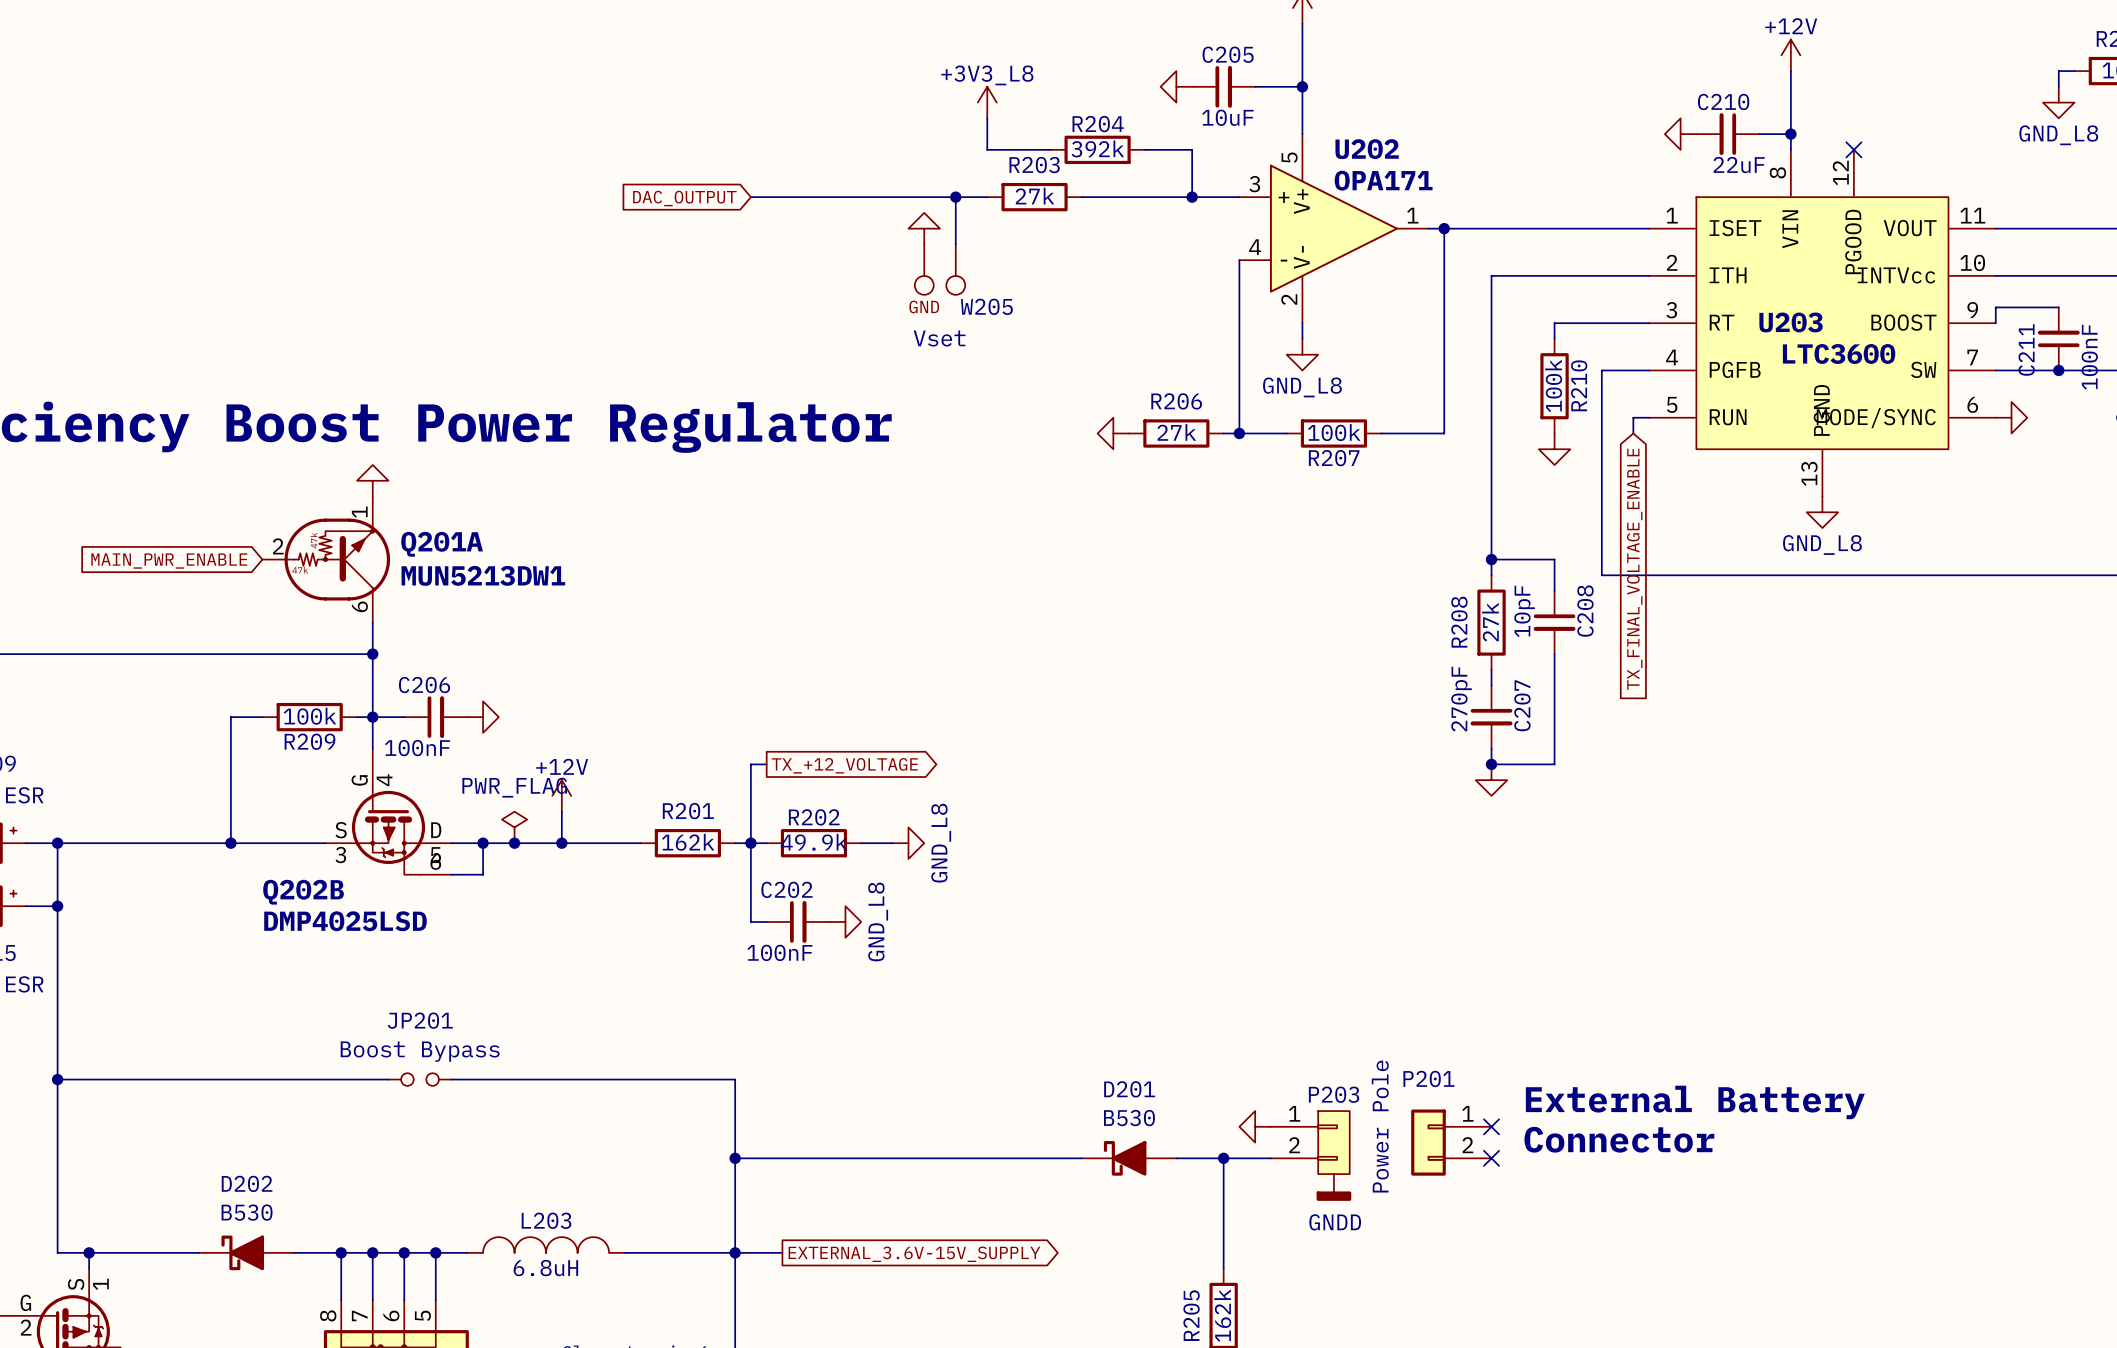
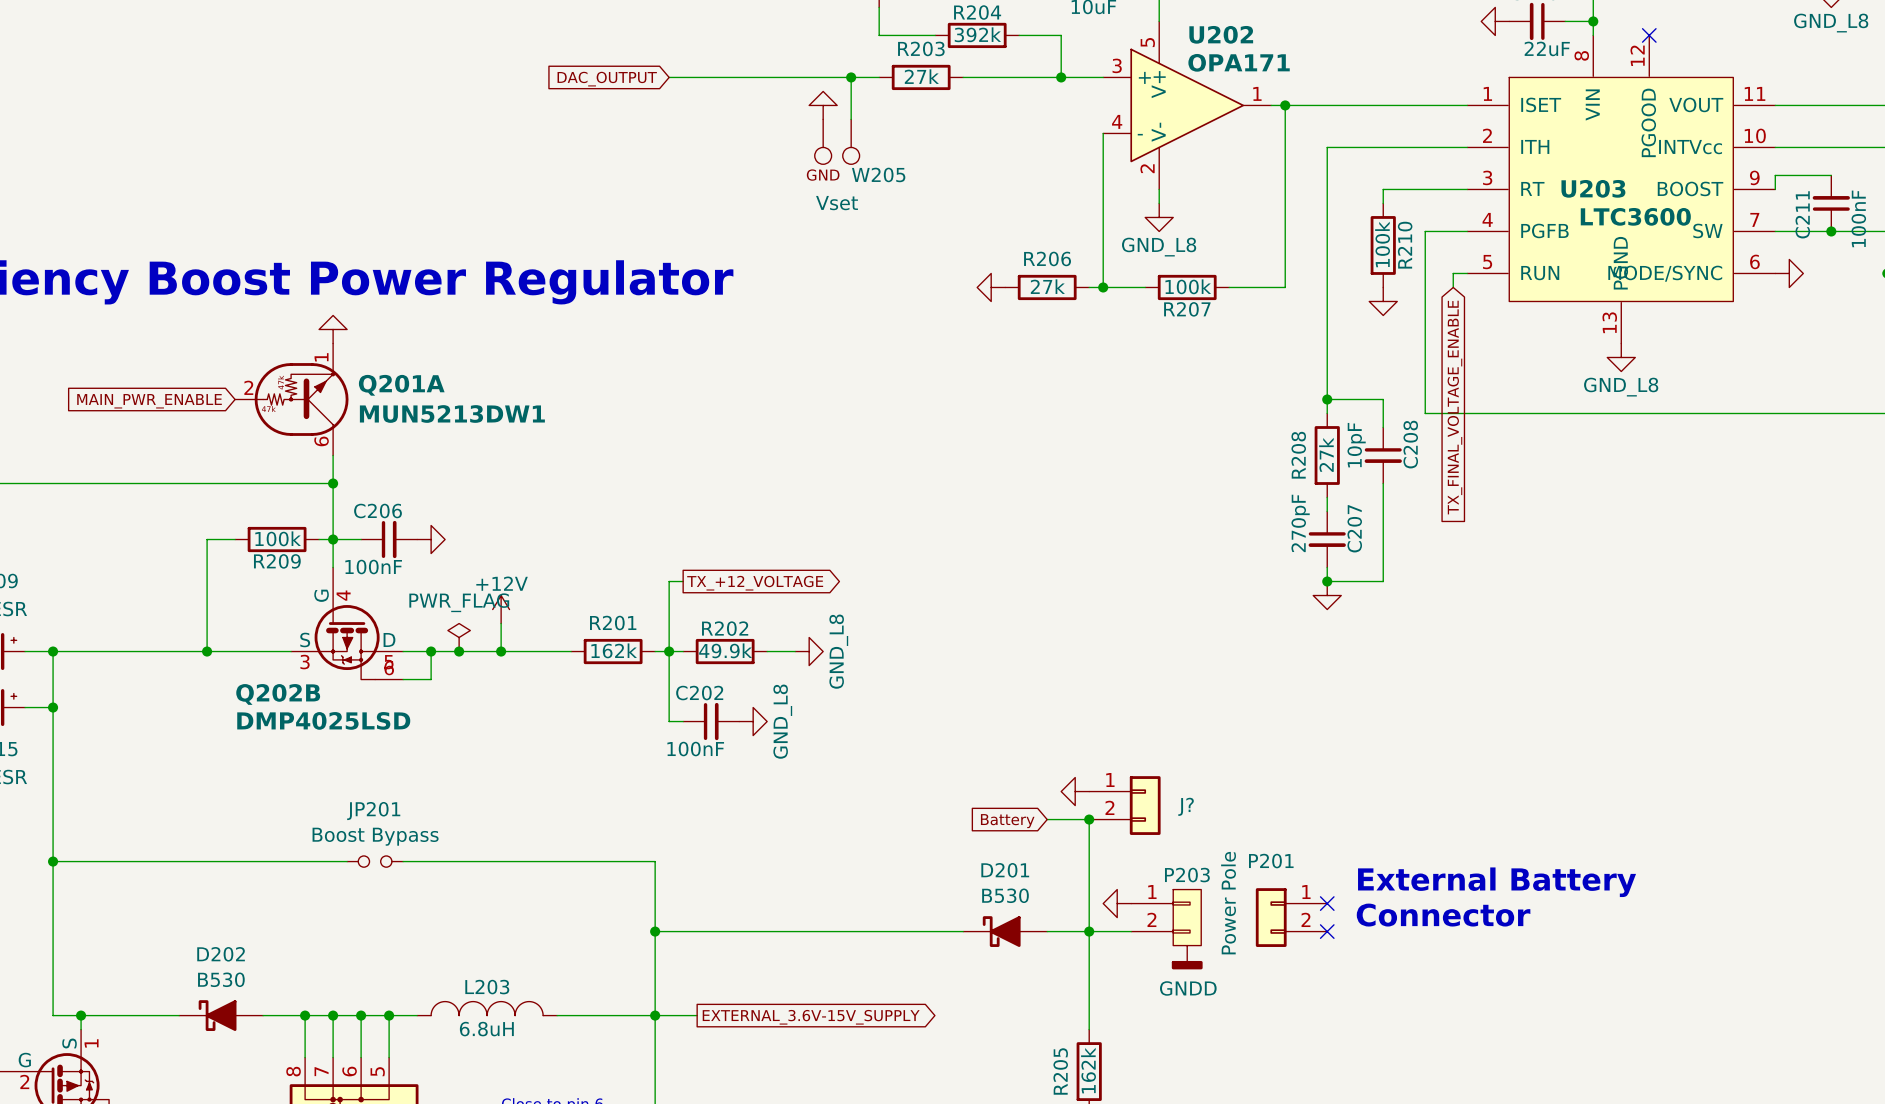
power symbol: none -> (1075, 791)
J?: none -> (1124, 805)
wire: none -> (1047, 819) (1089, 819) (1089, 931)
junction: none -> (1089, 819)
global label: none -> Battery (1007, 821)

